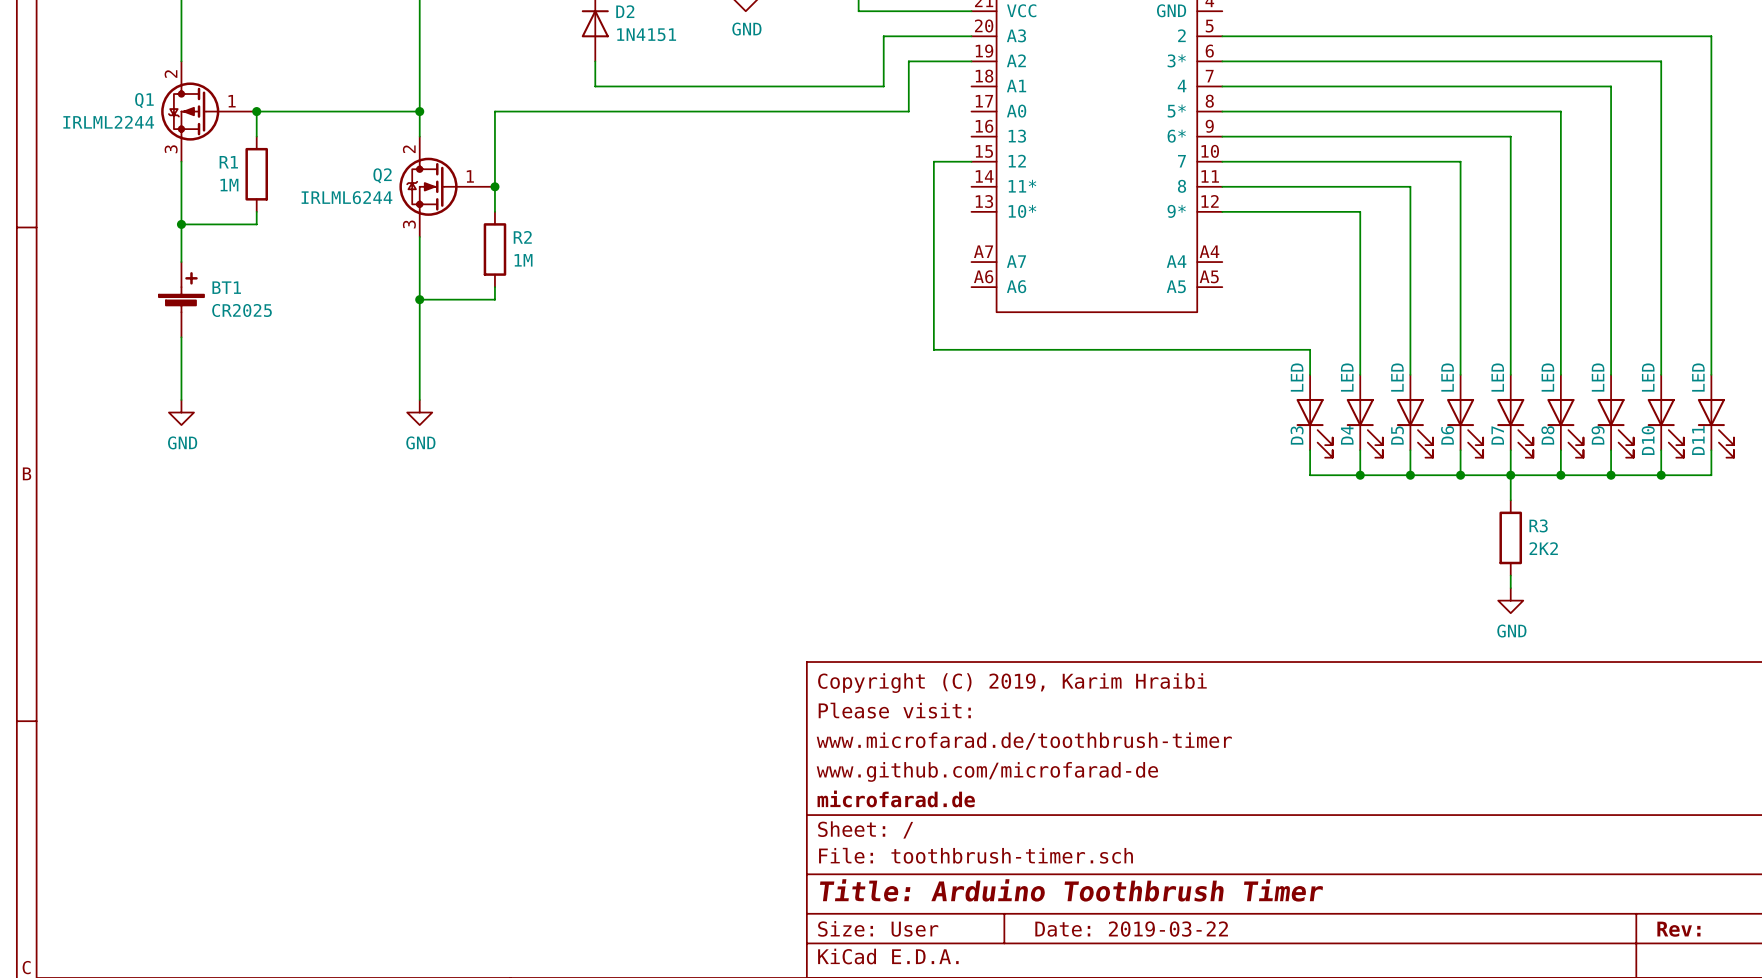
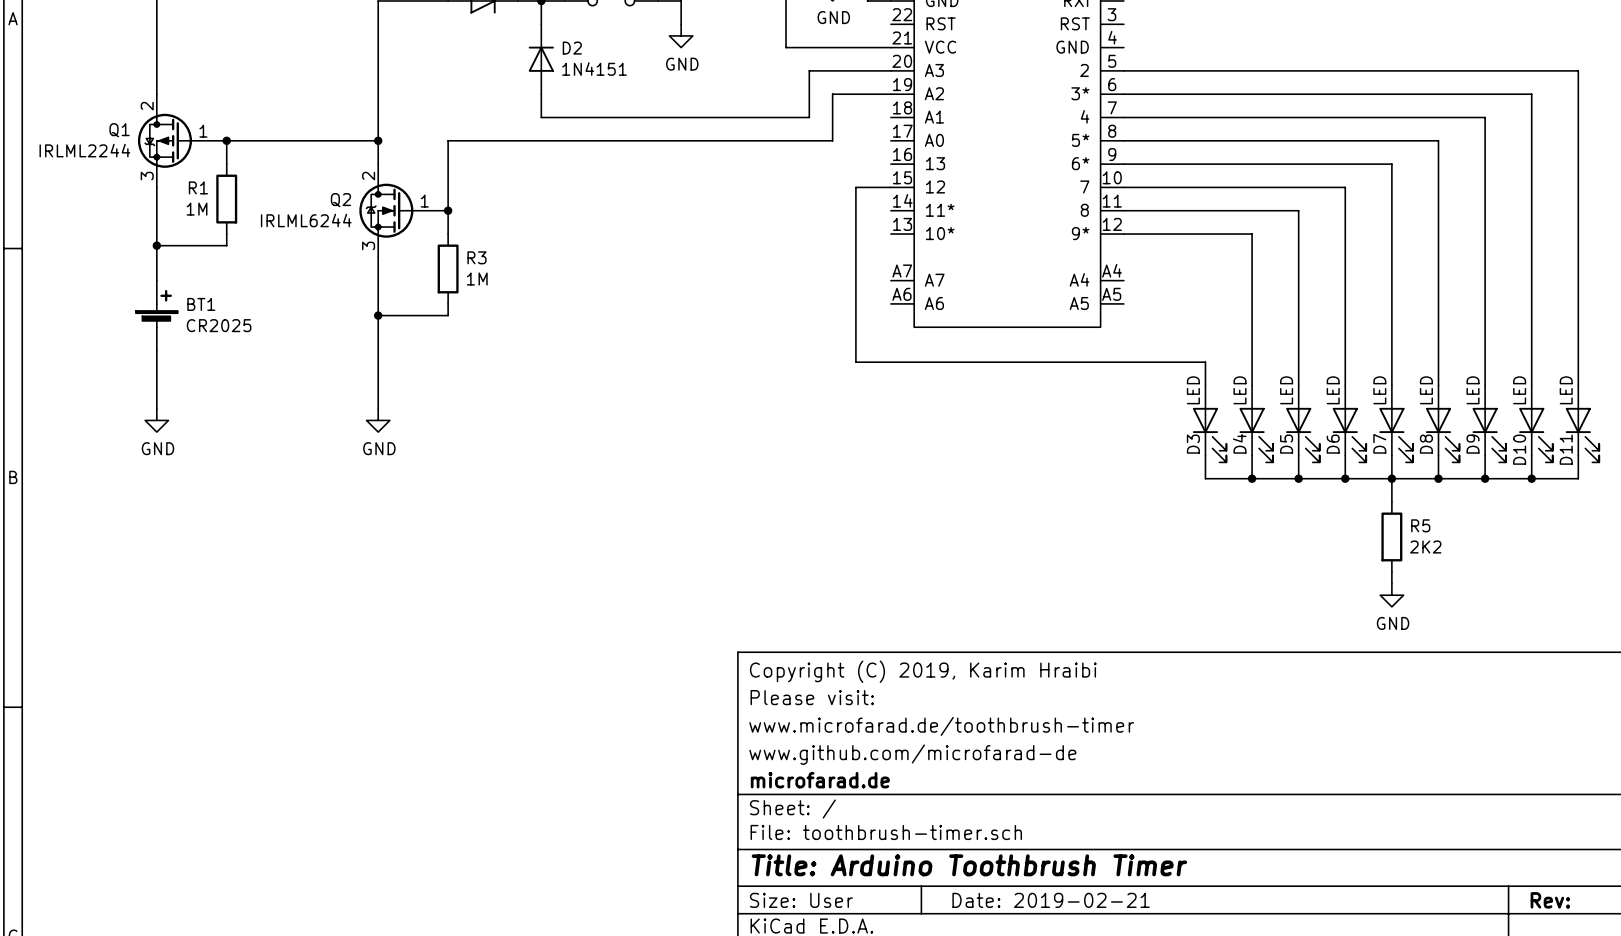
R2 name: R2 (522, 237) -> R3 (477, 257)
R3 name: R3 (1538, 525) -> R5 (1420, 525)
title block: Date: 2019-03-22 (1131, 929) -> Date: 2019-02-21 (1051, 900)

